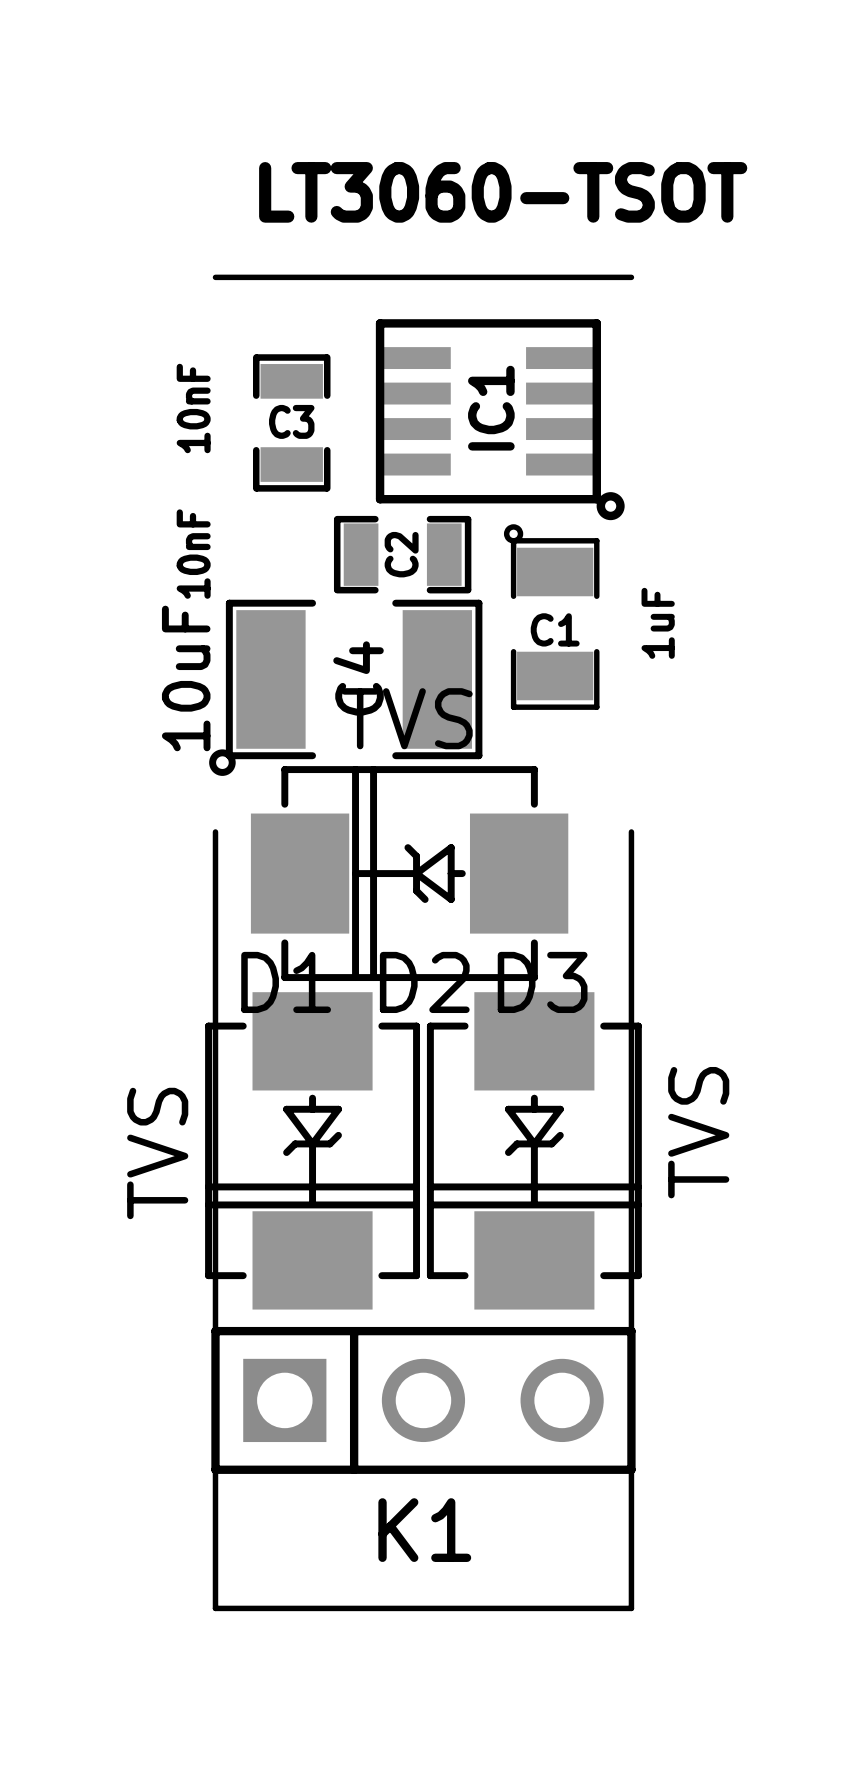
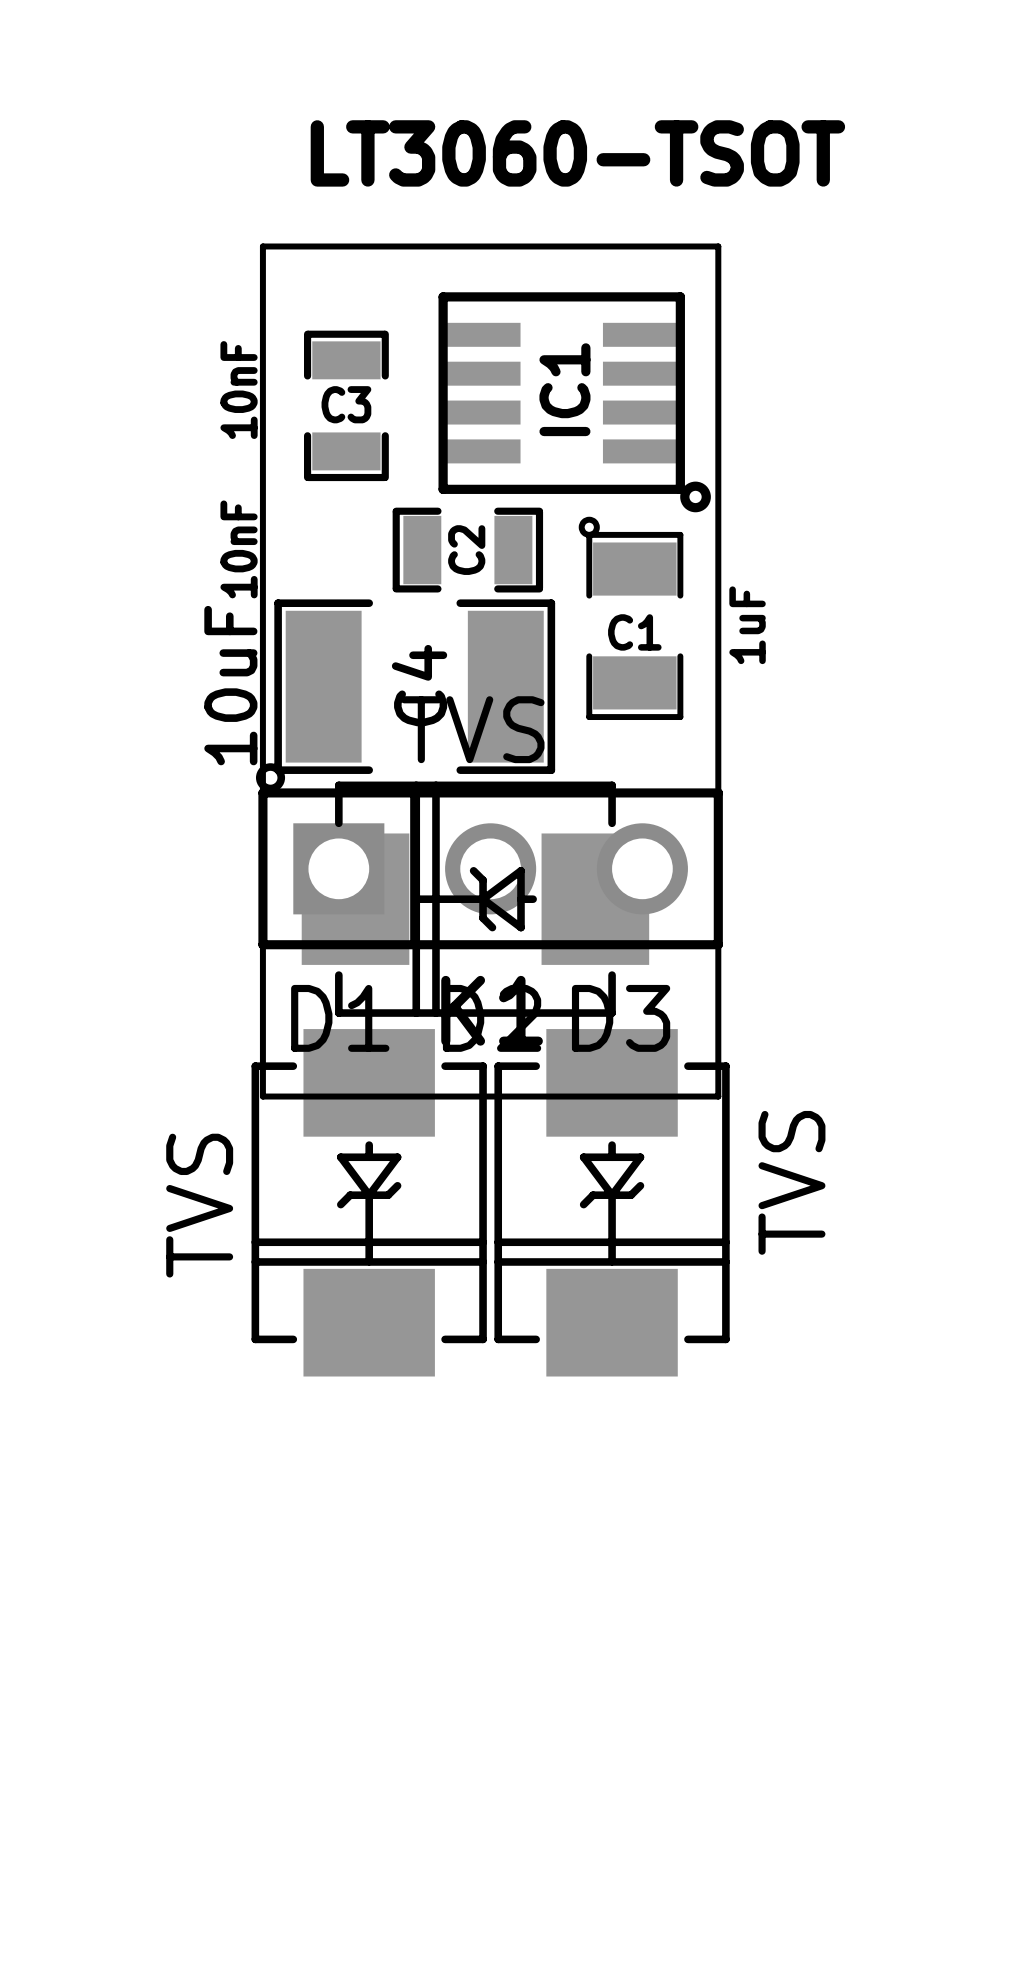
board edge: none -> (262, 246) (262, 853)
board edge: none -> (718, 246) (718, 853)
board edge: (215, 1053) (215, 1608) (631, 1608) (631, 1053) -> (262, 1096) (718, 1096)
K1 position: (423, 1400) -> (490, 868)

